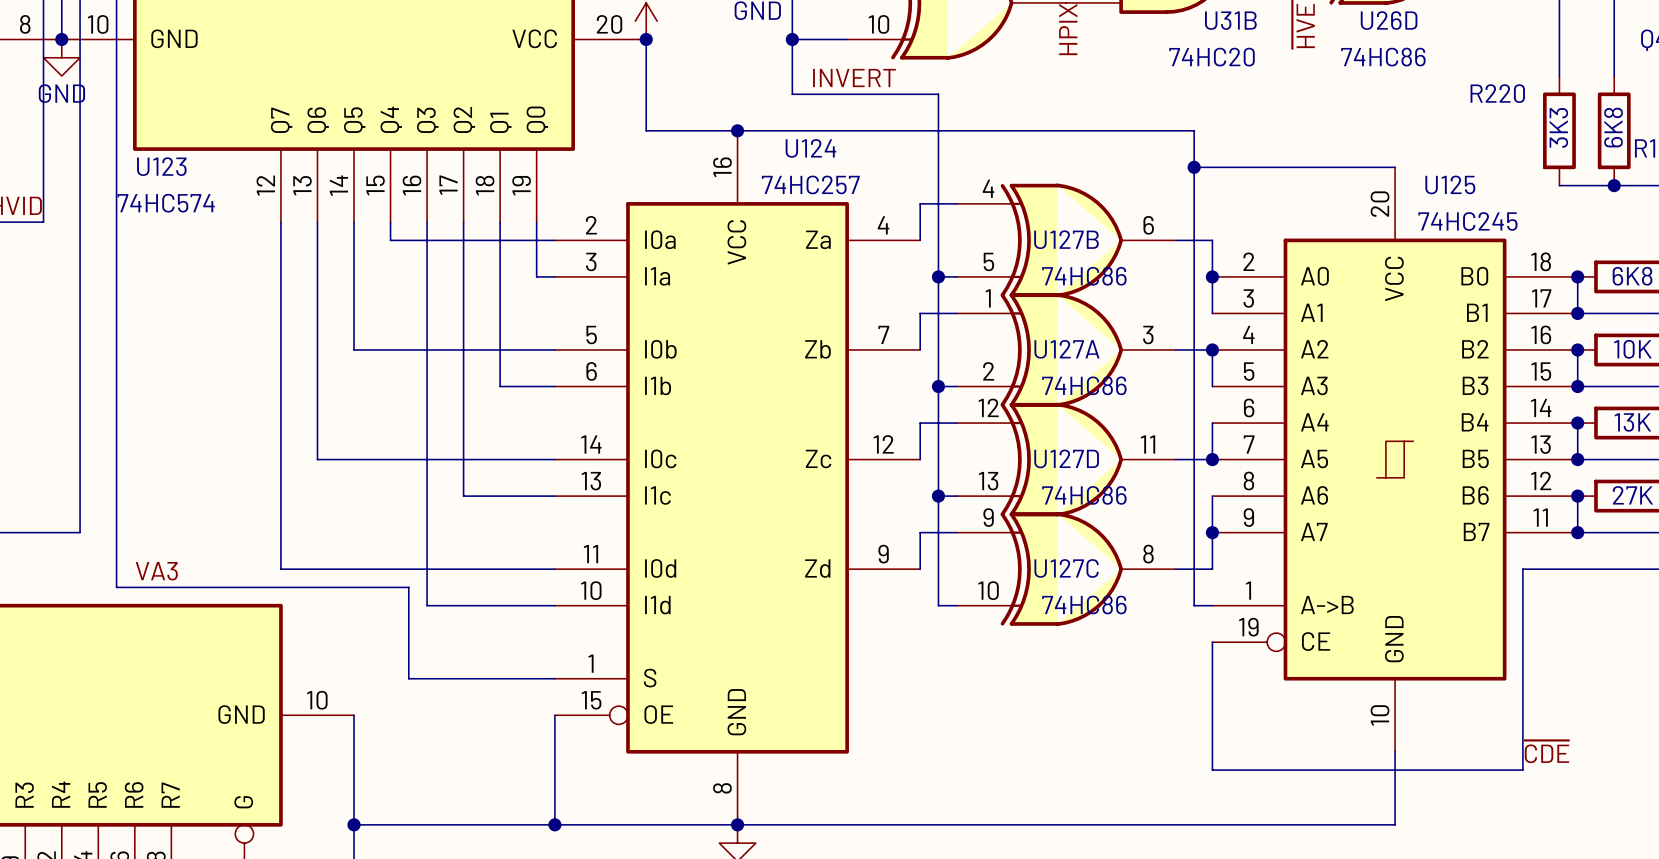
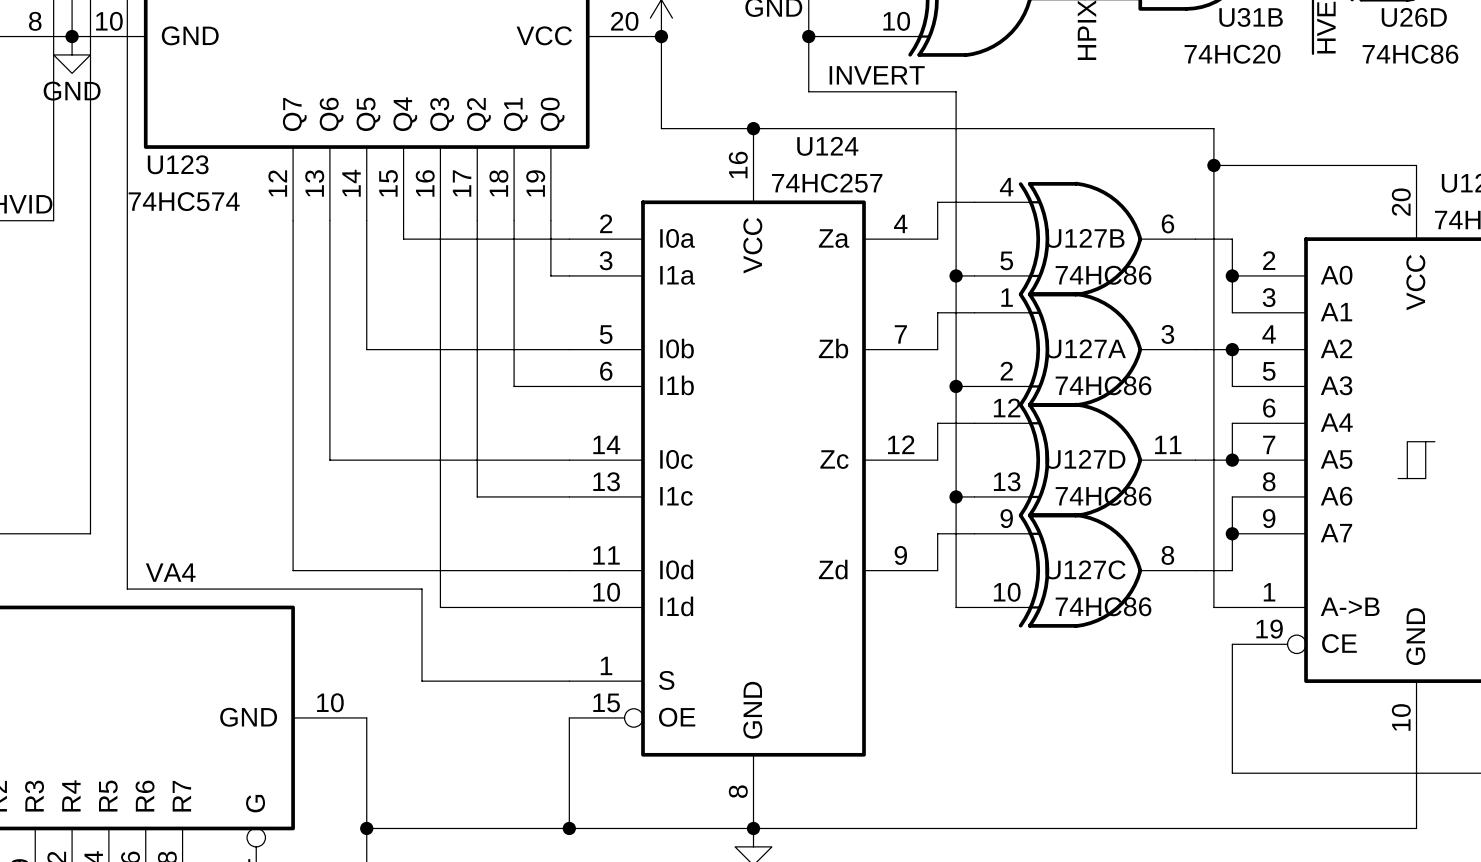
label: VA3 (156, 571) -> VA4 (170, 572)

